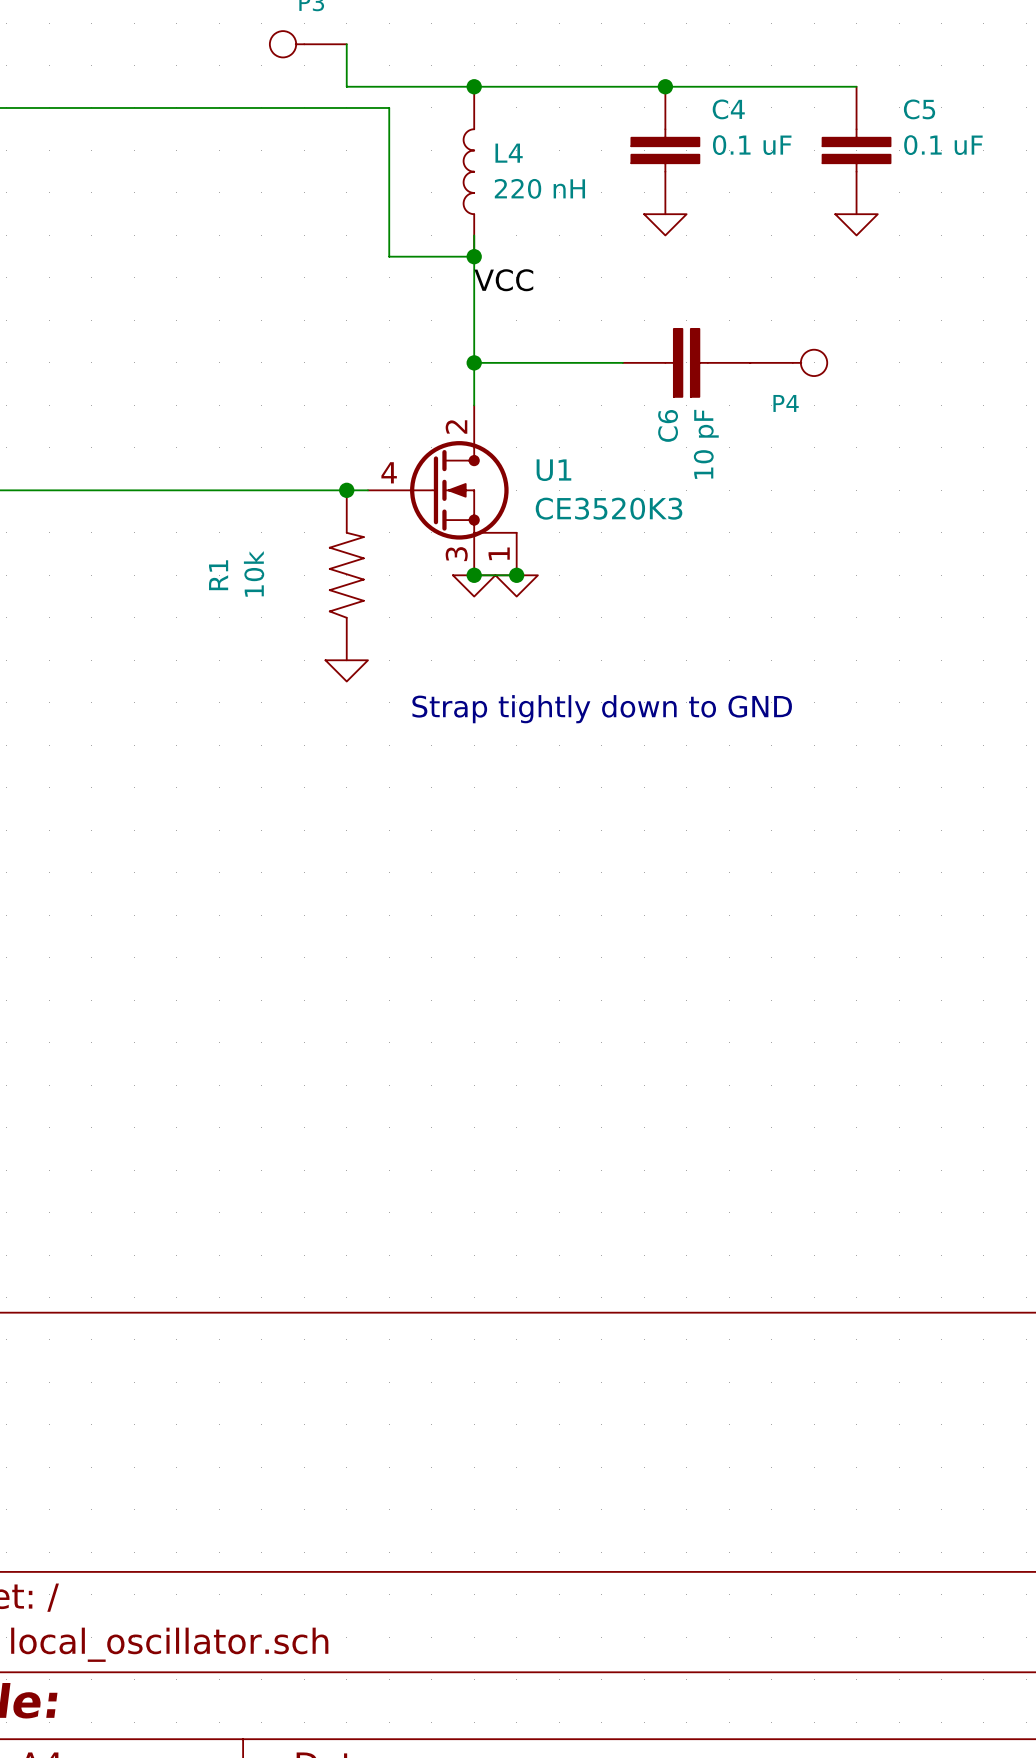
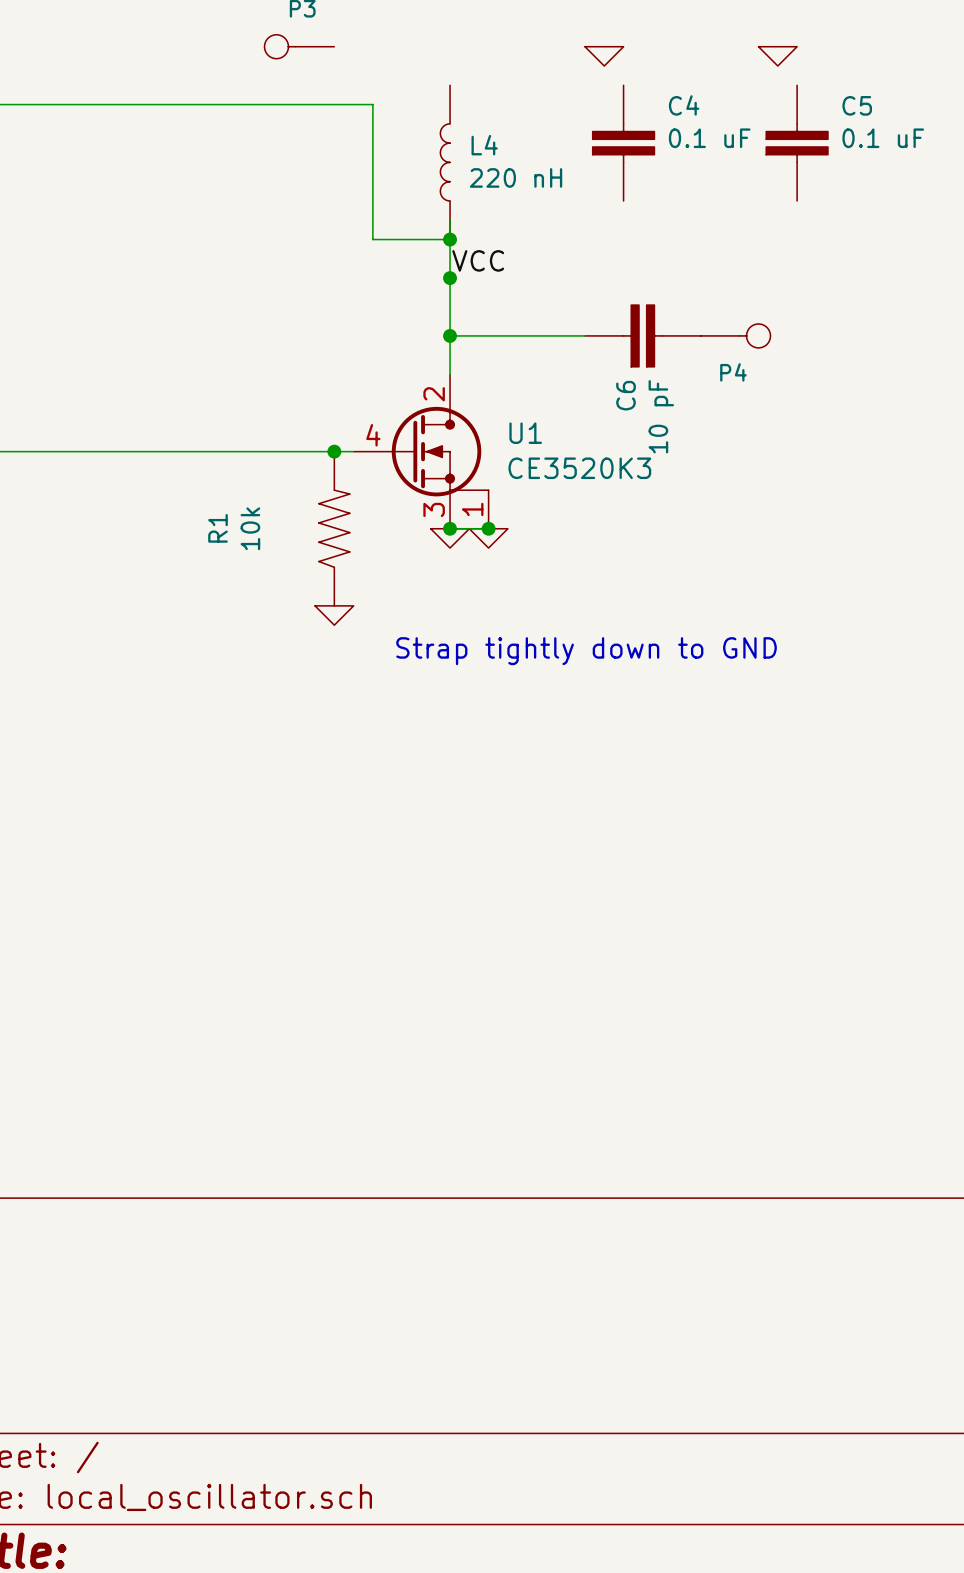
wire: (346, 44) (346, 86) (856, 86) -> none
power symbol: none -> (604, 56)
power symbol: none -> (777, 56)
junction: (474, 86) -> none
junction: (665, 86) -> none
power symbol: (665, 224) -> none
power symbol: (856, 224) -> none
junction: none -> (450, 278)

